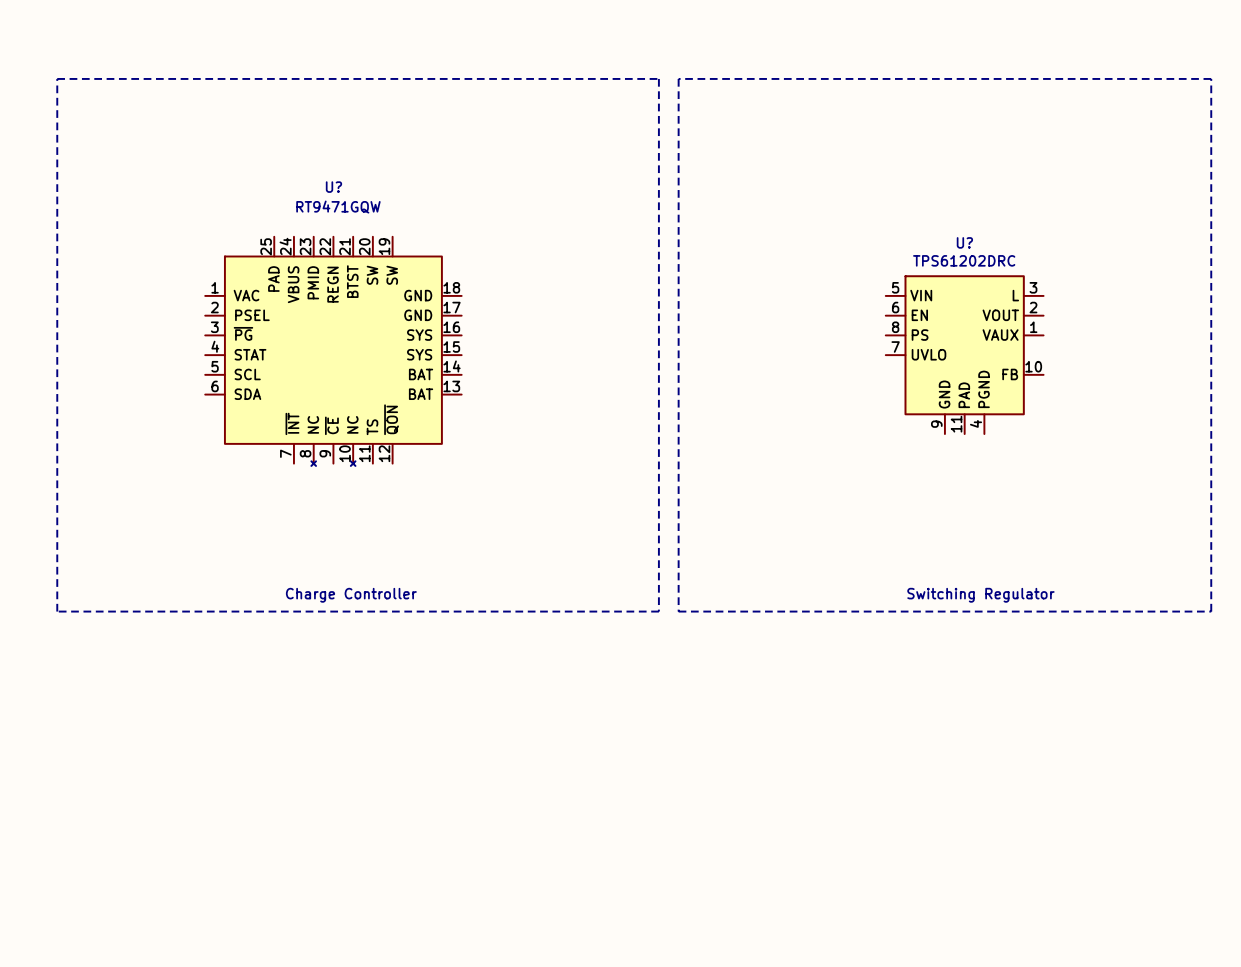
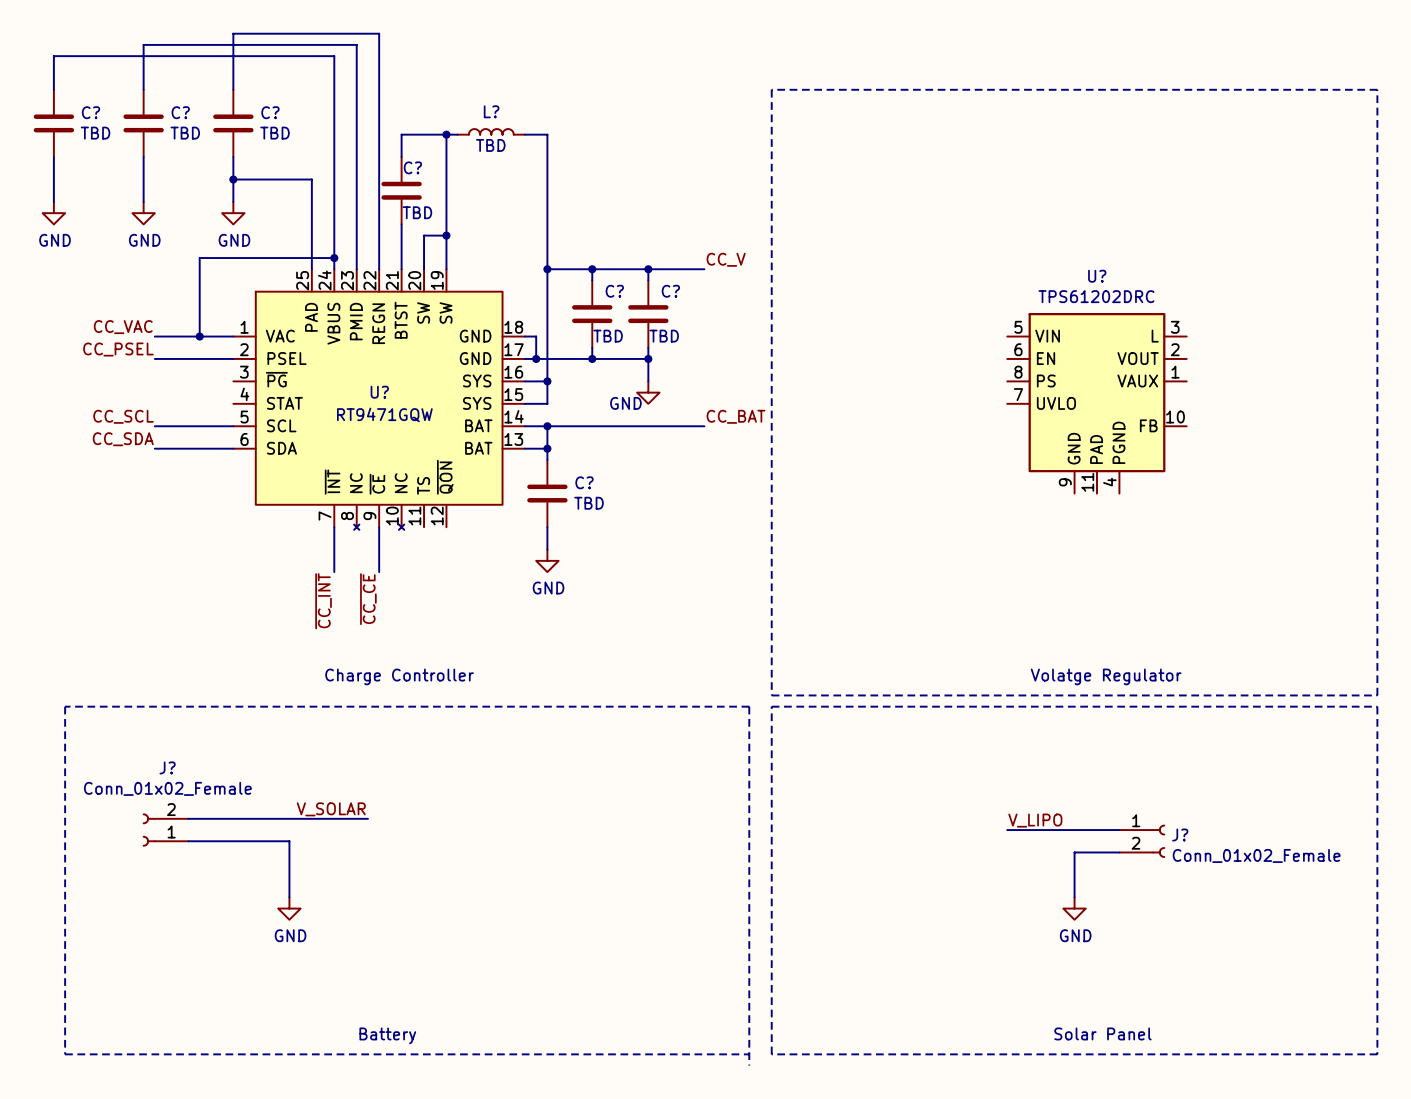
wire: none -> (53, 89) (53, 56) (334, 56) (334, 269)
line: (57, 78) (57, 611) (658, 611) (658, 78) (57, 78) -> none
wire: none -> (143, 89) (143, 44) (356, 44) (356, 269)
wire: none -> (233, 89) (233, 33) (379, 33) (379, 269)
C?: none -> TBD (53, 123)
C?: none -> TBD (143, 123)
C?: none -> TBD (233, 123)
L?: none -> TBD (491, 131)
wire: none -> (446, 134) (446, 269)
junction: none -> (446, 134)
wire: none -> (457, 134) (401, 134) (401, 157)
wire: none -> (524, 134) (547, 134) (547, 403) (524, 403)
wire: none -> (53, 157) (53, 201)
wire: none -> (143, 157) (143, 201)
wire: none -> (233, 157) (233, 201)
wire: none -> (233, 179) (311, 179) (311, 269)
junction: none -> (233, 179)
C?: none -> TBD (401, 190)
power symbol: none -> GND (53, 213)
power symbol: none -> GND (143, 213)
power symbol: none -> GND (233, 213)
U? name position: U? (333, 187) -> U? (379, 392)
wire: none -> (401, 224) (401, 269)
U? value position: RT9471GQW (338, 207) -> RT9471GQW (384, 414)
wire: none -> (446, 235) (424, 235) (424, 269)
junction: none -> (446, 235)
wire: none -> (334, 258) (199, 258) (199, 336)
junction: none -> (334, 258)
label: none -> CC_V (726, 259)
wire: none -> (547, 269) (704, 269)
junction: none -> (547, 269)
wire: none -> (592, 269) (592, 280)
junction: none -> (592, 269)
wire: none -> (648, 269) (648, 280)
junction: none -> (648, 269)
C?: none -> TBD (592, 314)
C?: none -> TBD (648, 314)
label: none -> CC_VAC (123, 327)
wire: none -> (154, 336) (233, 336)
junction: none -> (199, 336)
wire: none -> (524, 336) (536, 336) (536, 358)
wire: none -> (592, 347) (592, 358)
wire: none -> (648, 347) (648, 381)
label: none -> CC_PSEL (118, 349)
wire: none -> (154, 358) (233, 358)
wire: none -> (524, 358) (648, 358)
junction: none -> (536, 358)
junction: none -> (592, 358)
junction: none -> (648, 358)
wire: none -> (524, 381) (547, 381)
junction: none -> (547, 381)
power symbol: none -> GND (648, 392)
label: none -> CC_SCL (123, 416)
label: none -> CC_BAT (736, 416)
wire: none -> (154, 426) (233, 426)
wire: none -> (524, 426) (704, 426)
wire: none -> (547, 426) (547, 459)
junction: none -> (547, 426)
label: none -> CC_SDA (123, 439)
wire: none -> (154, 448) (233, 448)
wire: none -> (524, 448) (547, 448)
junction: none -> (547, 448)
C?: none -> TBD (547, 493)
wire: none -> (334, 527) (334, 572)
wire: none -> (379, 527) (379, 572)
wire: none -> (547, 527) (547, 549)
power symbol: none -> GND (547, 560)
label: none -> ~{CC_CE} (368, 599)
label: none -> ~{CC_INT} (323, 601)
text: Switching Regulator (980, 595) -> Volatge Regulator (1106, 676)
line: none -> (771, 706) (1377, 706) (1377, 1054) (771, 1054) (771, 706)
label: none -> V_SOLAR (331, 809)
wire: none -> (188, 818) (367, 818)
label: none -> V_LIPO (1035, 820)
J?: none -> Conn_01x02_Female (165, 830)
wire: none -> (1007, 830) (1119, 830)
wire: none -> (188, 841) (289, 841) (289, 897)
J?: none -> Conn_01x02_Female (1142, 841)
wire: none -> (1119, 852) (1074, 852) (1074, 897)
power symbol: none -> GND (289, 908)
power symbol: none -> GND (1074, 908)
text: none -> Solar Panel (1102, 1033)
text: none -> Battery (387, 1035)
line: none -> (749, 1054) (65, 1054) (65, 706) (749, 706) (749, 1065)

